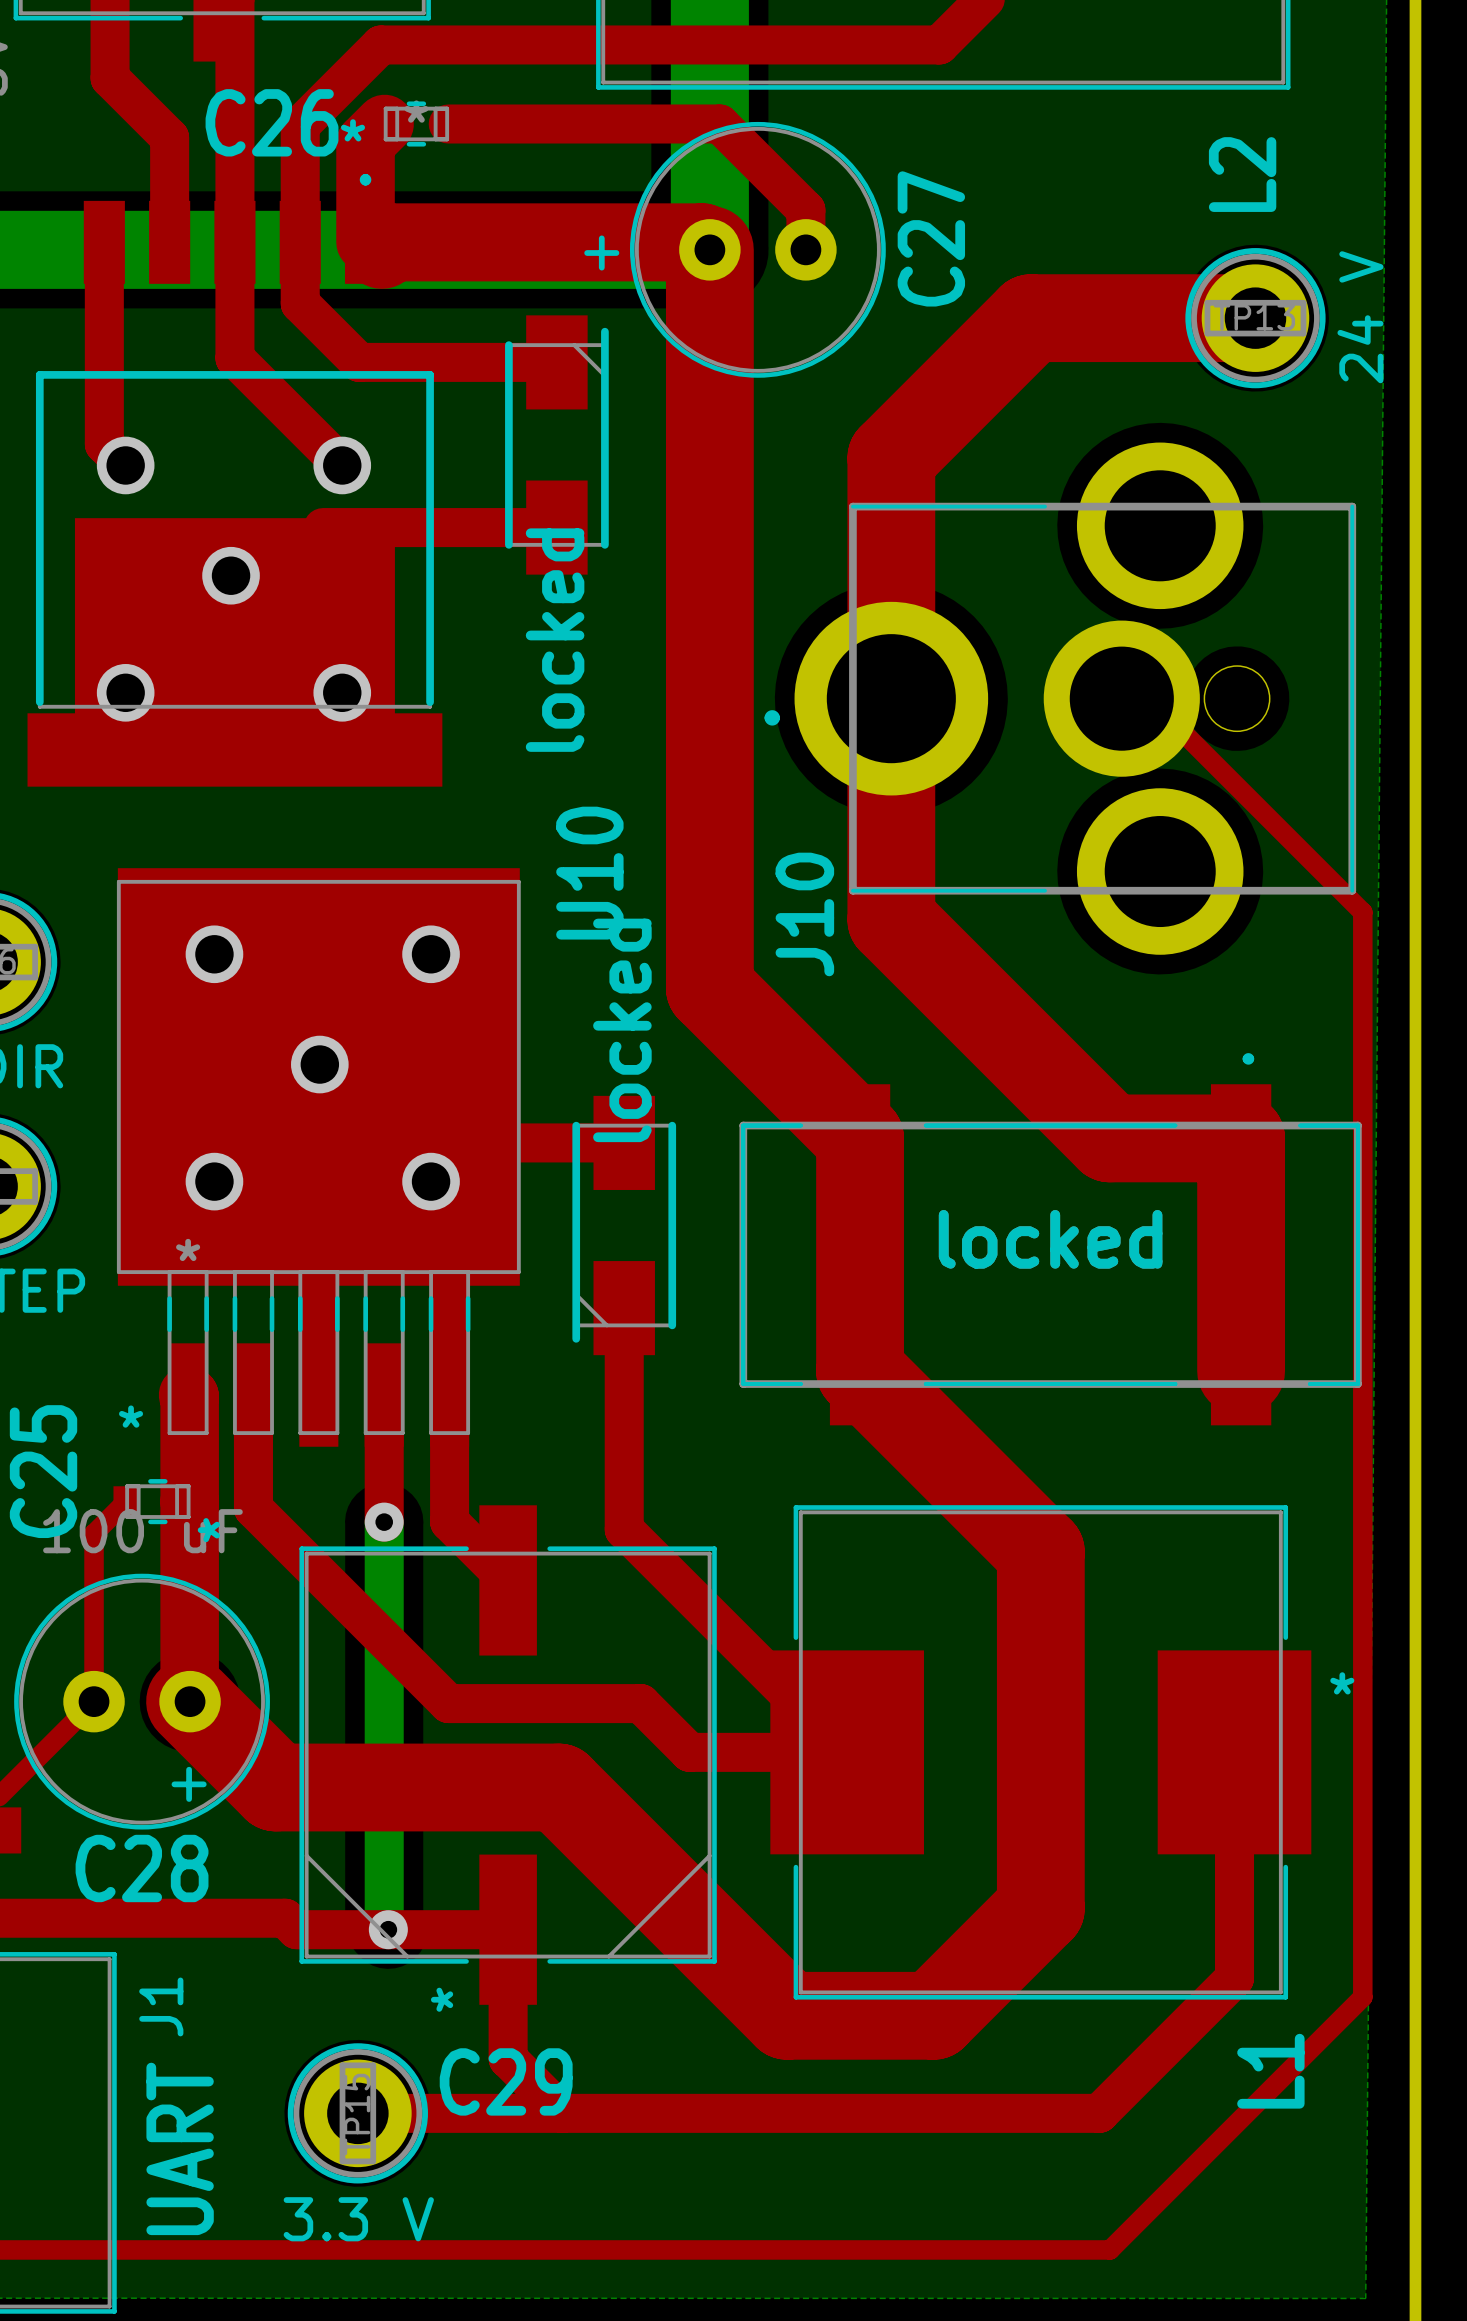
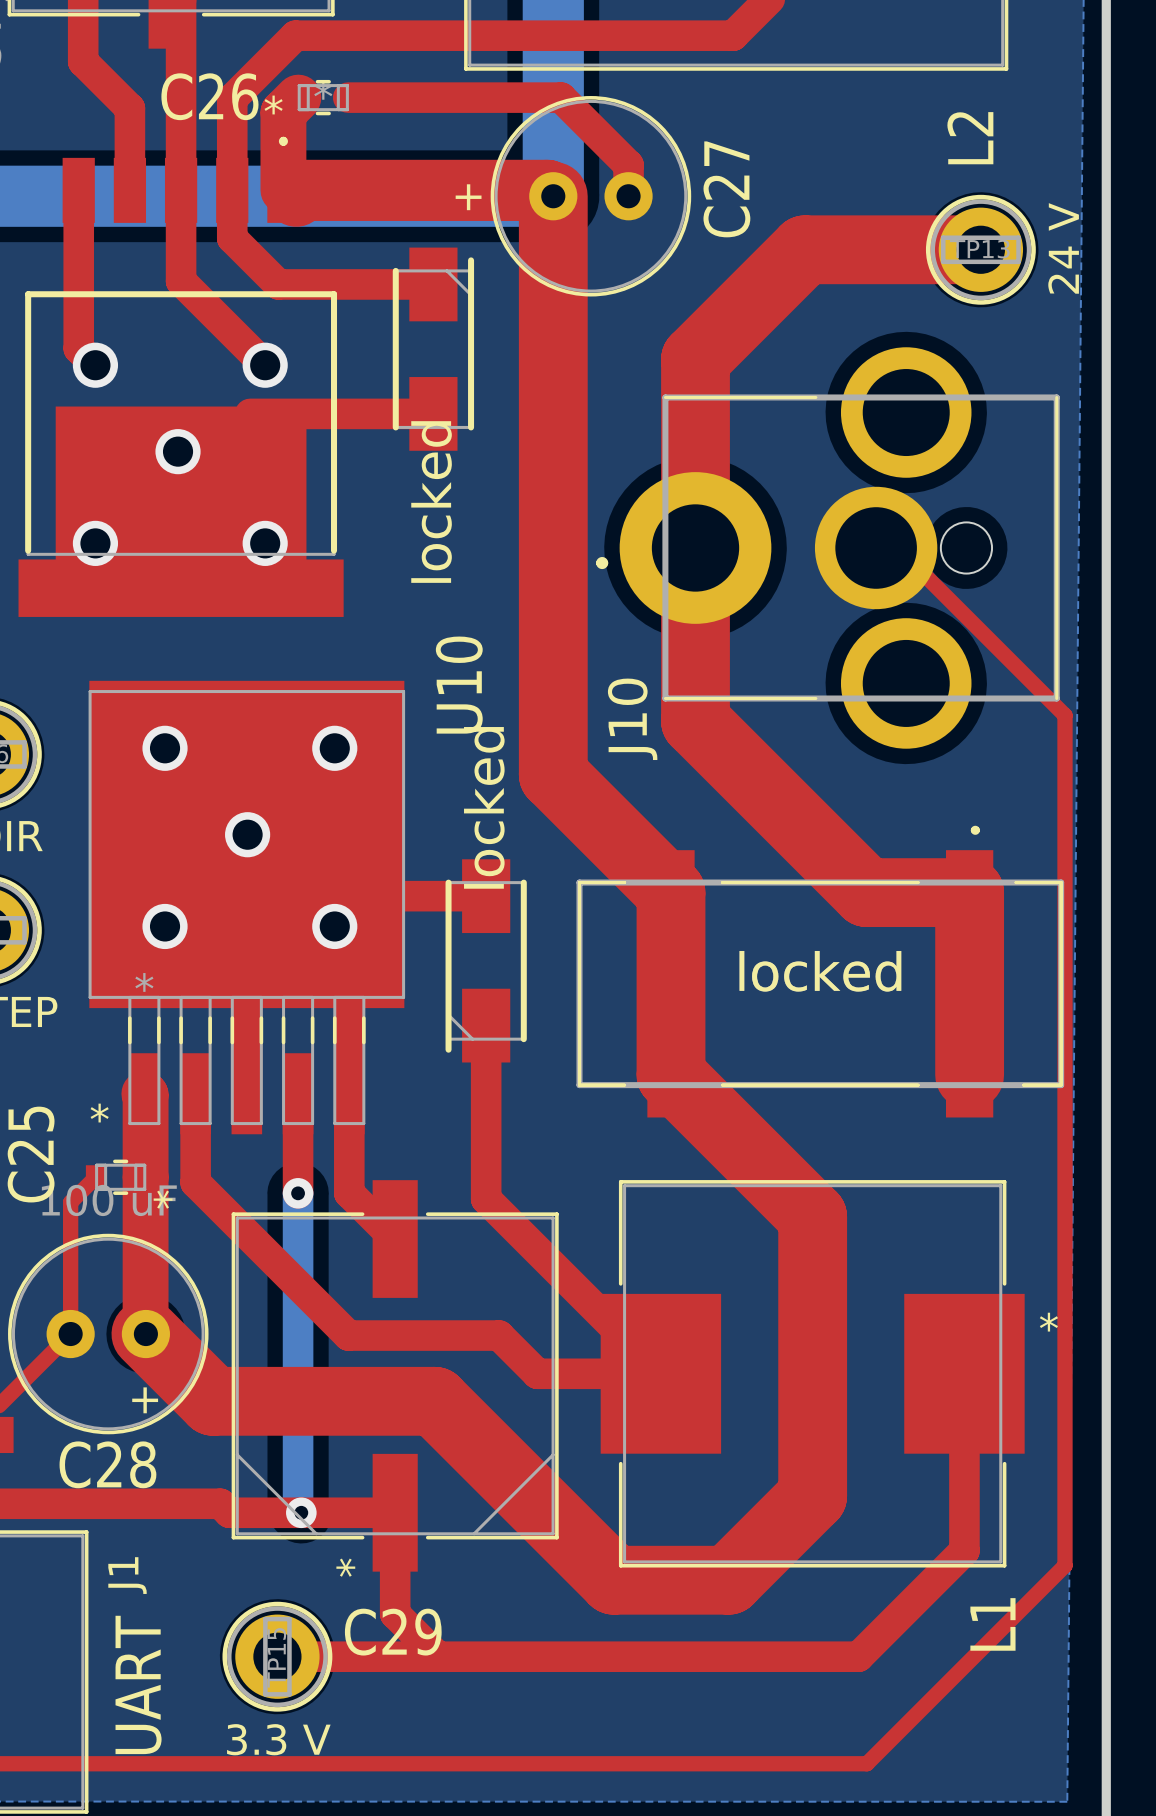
J10 footprint: [764, 442, 1357, 955] -> [596, 347, 1060, 749]

